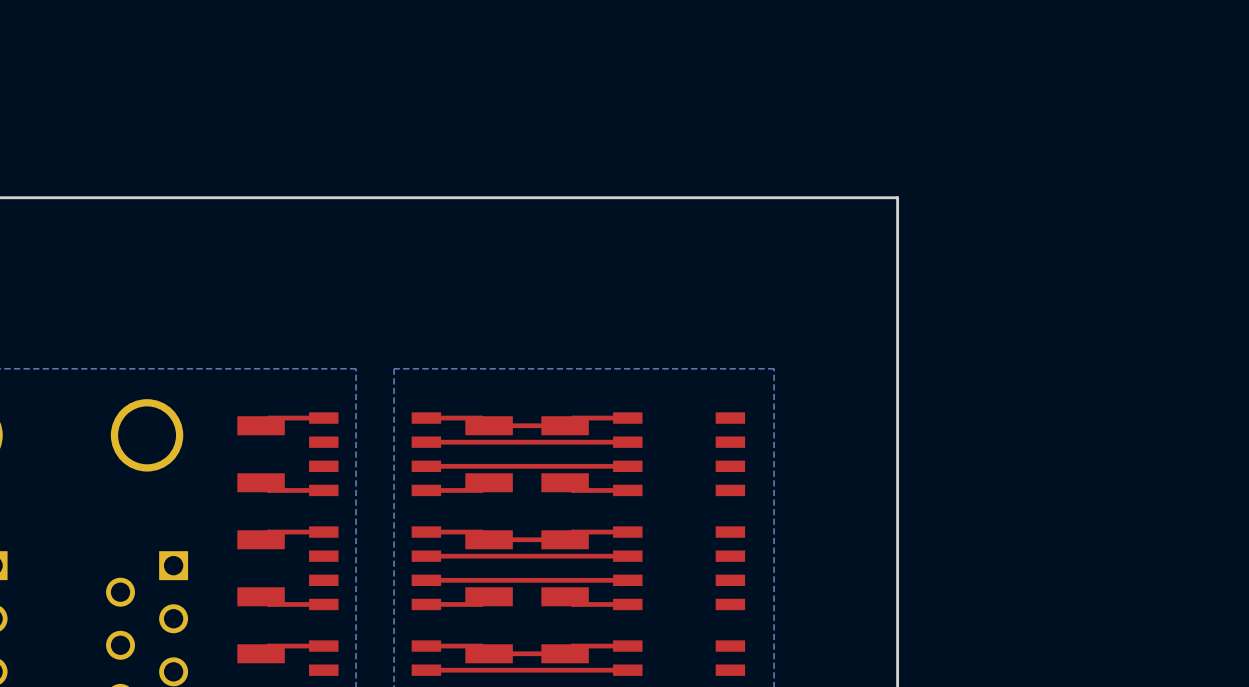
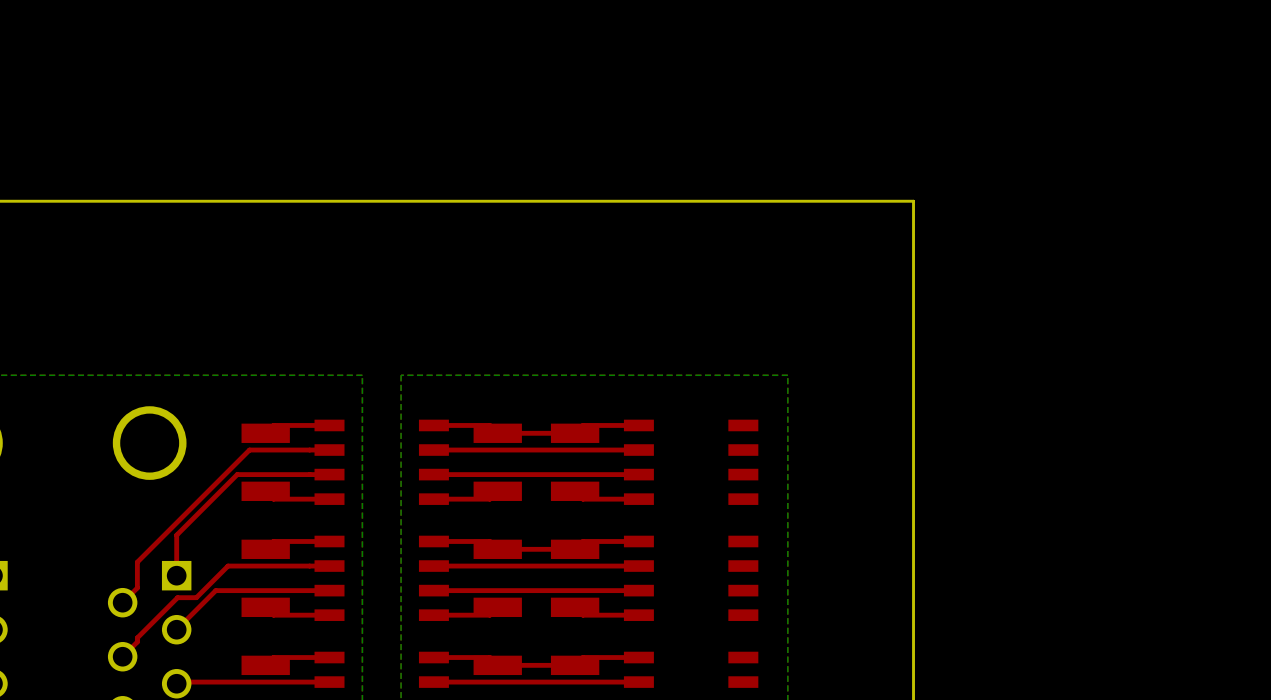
top track: none -> (329, 450) (249, 450) (137, 562) (137, 587) (122, 602)
top track: none -> (329, 474) (237, 474) (176, 535) (176, 575)
top track: none -> (329, 566) (228, 566) (196, 597) (177, 597) (137, 637) (137, 641) (122, 656)
top track: none -> (329, 590) (215, 590) (176, 629)
top track: none -> (329, 682) (178, 682)

